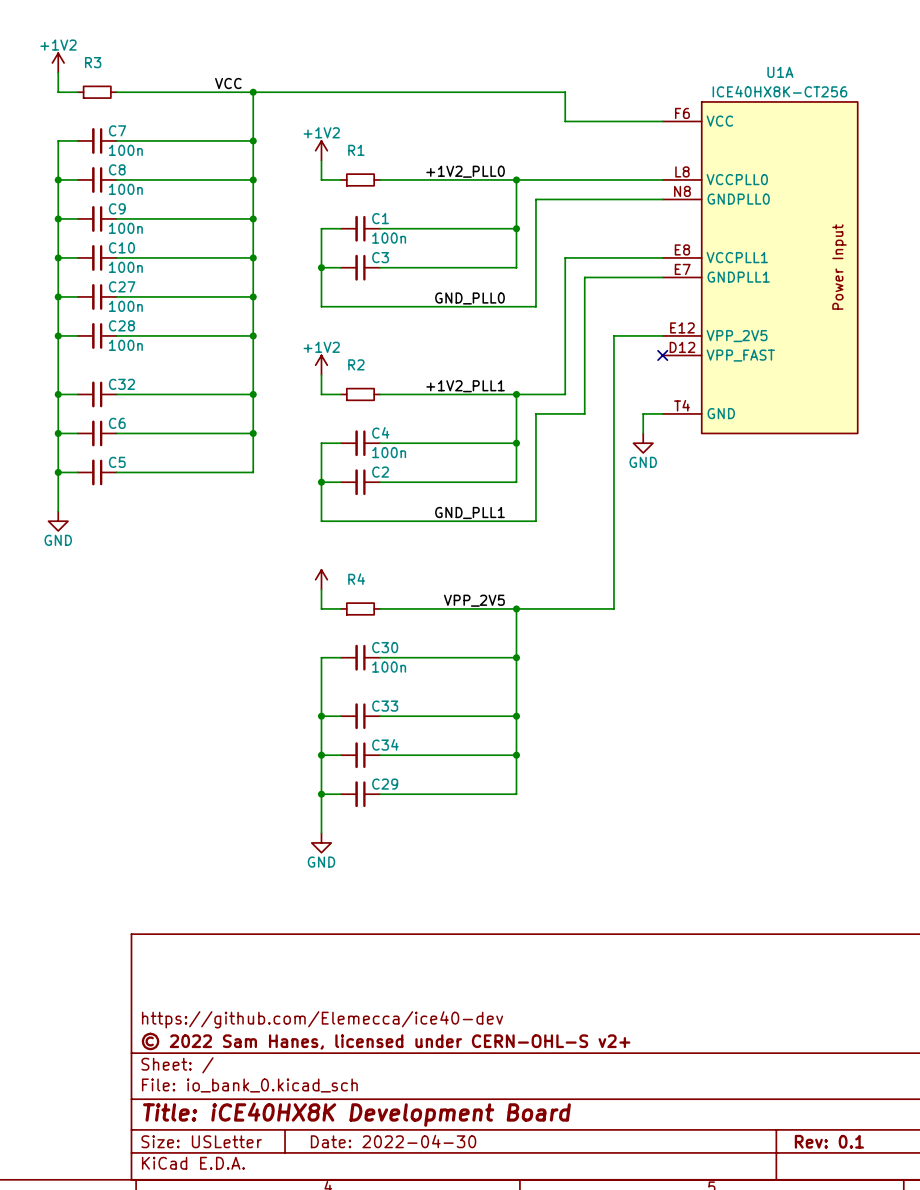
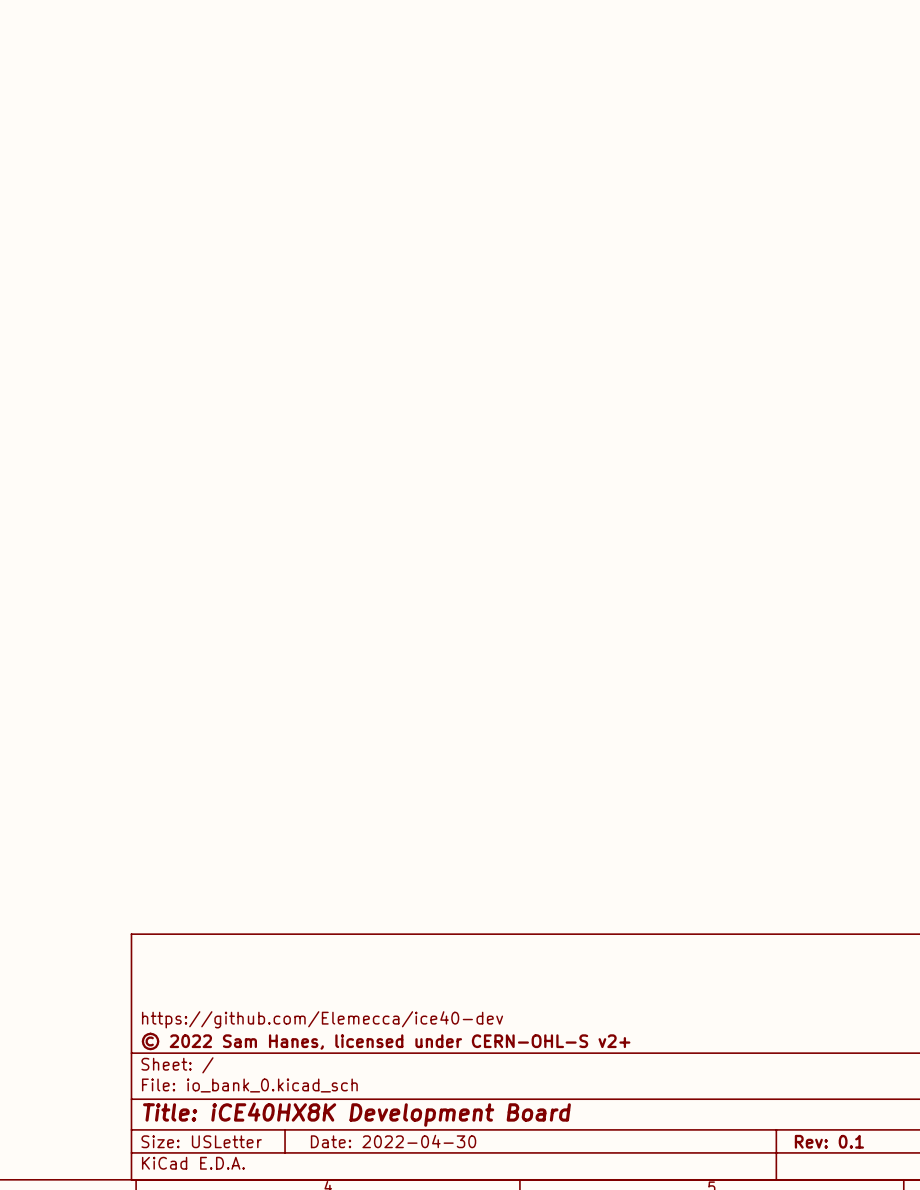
power symbol: +1V2 (58, 62) -> none
wire: (58, 72) (58, 92) (77, 92) -> none
label: VCC (228, 83) -> none
R3: (97, 92) -> none
wire: (116, 92) (565, 92) (565, 121) (662, 121) -> none
wire: (253, 92) (253, 472) (116, 472) -> none
junction: (253, 92) -> none
wire: (77, 140) (58, 140) (58, 511) -> none
C7: 100n (97, 140) -> none
wire: (116, 140) (253, 140) -> none
junction: (253, 140) -> none
power symbol: +1V2 (321, 150) -> none
wire: (321, 160) (321, 179) (340, 179) -> none
label: +1V2_PLL0 (465, 171) -> none
wire: (58, 179) (77, 179) -> none
junction: (58, 179) -> none
C8: 100n (97, 179) -> none
wire: (116, 179) (253, 179) -> none
junction: (253, 179) -> none
R1: (360, 179) -> none
wire: (379, 179) (662, 179) -> none
wire: (516, 179) (516, 267) (379, 267) -> none
junction: (516, 179) -> none
wire: (662, 199) (535, 199) (535, 306) (321, 306) (321, 228) (340, 228) -> none
wire: (58, 218) (77, 218) -> none
junction: (58, 218) -> none
C9: 100n (97, 218) -> none
wire: (116, 218) (253, 218) -> none
junction: (253, 218) -> none
C1: 100n (360, 228) -> none
wire: (379, 228) (516, 228) -> none
junction: (516, 228) -> none
wire: (58, 257) (77, 257) -> none
junction: (58, 257) -> none
C10: 100n (97, 257) -> none
wire: (116, 257) (253, 257) -> none
junction: (253, 257) -> none
wire: (662, 257) (565, 257) (565, 394) (379, 394) -> none
wire: (321, 267) (340, 267) -> none
junction: (321, 267) -> none
C3: (360, 267) -> none
U1A: ICE40HX8K-CT256 (760, 267) -> none
wire: (662, 277) (584, 277) (584, 413) (535, 413) (535, 521) (321, 521) (321, 443) (340, 443) -> none
wire: (58, 296) (77, 296) -> none
junction: (58, 296) -> none
C27: 100n (97, 296) -> none
wire: (116, 296) (253, 296) -> none
junction: (253, 296) -> none
label: GND_PLL0 (469, 298) -> none
wire: (58, 335) (77, 335) -> none
junction: (58, 335) -> none
C28: 100n (97, 335) -> none
wire: (116, 335) (253, 335) -> none
junction: (253, 335) -> none
wire: (662, 335) (613, 335) (613, 608) (379, 608) -> none
no-connect mark: (662, 355) -> none
power symbol: +1V2 (321, 365) -> none
wire: (321, 374) (321, 394) (340, 394) -> none
label: +1V2_PLL1 (465, 386) -> none
wire: (58, 394) (77, 394) -> none
junction: (58, 394) -> none
C32: (97, 394) -> none
wire: (116, 394) (253, 394) -> none
junction: (253, 394) -> none
R2: (360, 394) -> none
wire: (516, 394) (516, 482) (379, 482) -> none
junction: (516, 394) -> none
wire: (662, 413) (643, 413) (643, 433) -> none
wire: (58, 433) (77, 433) -> none
junction: (58, 433) -> none
C6: (97, 433) -> none
wire: (116, 433) (253, 433) -> none
junction: (253, 433) -> none
C4: 100n (360, 443) -> none
wire: (379, 443) (516, 443) -> none
junction: (516, 443) -> none
power symbol: GND (643, 443) -> none
wire: (58, 472) (77, 472) -> none
junction: (58, 472) -> none
C5: (97, 472) -> none
wire: (321, 482) (340, 482) -> none
junction: (321, 482) -> none
C2: (360, 482) -> none
label: GND_PLL1 (469, 512) -> none
power symbol: GND (58, 521) -> none
power symbol: (321, 579) -> none
wire: (321, 589) (321, 608) (340, 608) -> none
label: VPP_2V5 (474, 600) -> none
R4: (360, 608) -> none
wire: (516, 608) (516, 794) (379, 794) -> none
junction: (516, 608) -> none
wire: (340, 657) (321, 657) (321, 833) -> none
C30: 100n (360, 657) -> none
wire: (379, 657) (516, 657) -> none
junction: (516, 657) -> none
wire: (321, 716) (340, 716) -> none
junction: (321, 716) -> none
C33: (360, 716) -> none
wire: (379, 716) (516, 716) -> none
junction: (516, 716) -> none
wire: (321, 755) (340, 755) -> none
junction: (321, 755) -> none
C34: (360, 755) -> none
wire: (379, 755) (516, 755) -> none
junction: (516, 755) -> none
wire: (321, 794) (340, 794) -> none
junction: (321, 794) -> none
C29: (360, 794) -> none
power symbol: GND (321, 842) -> none

